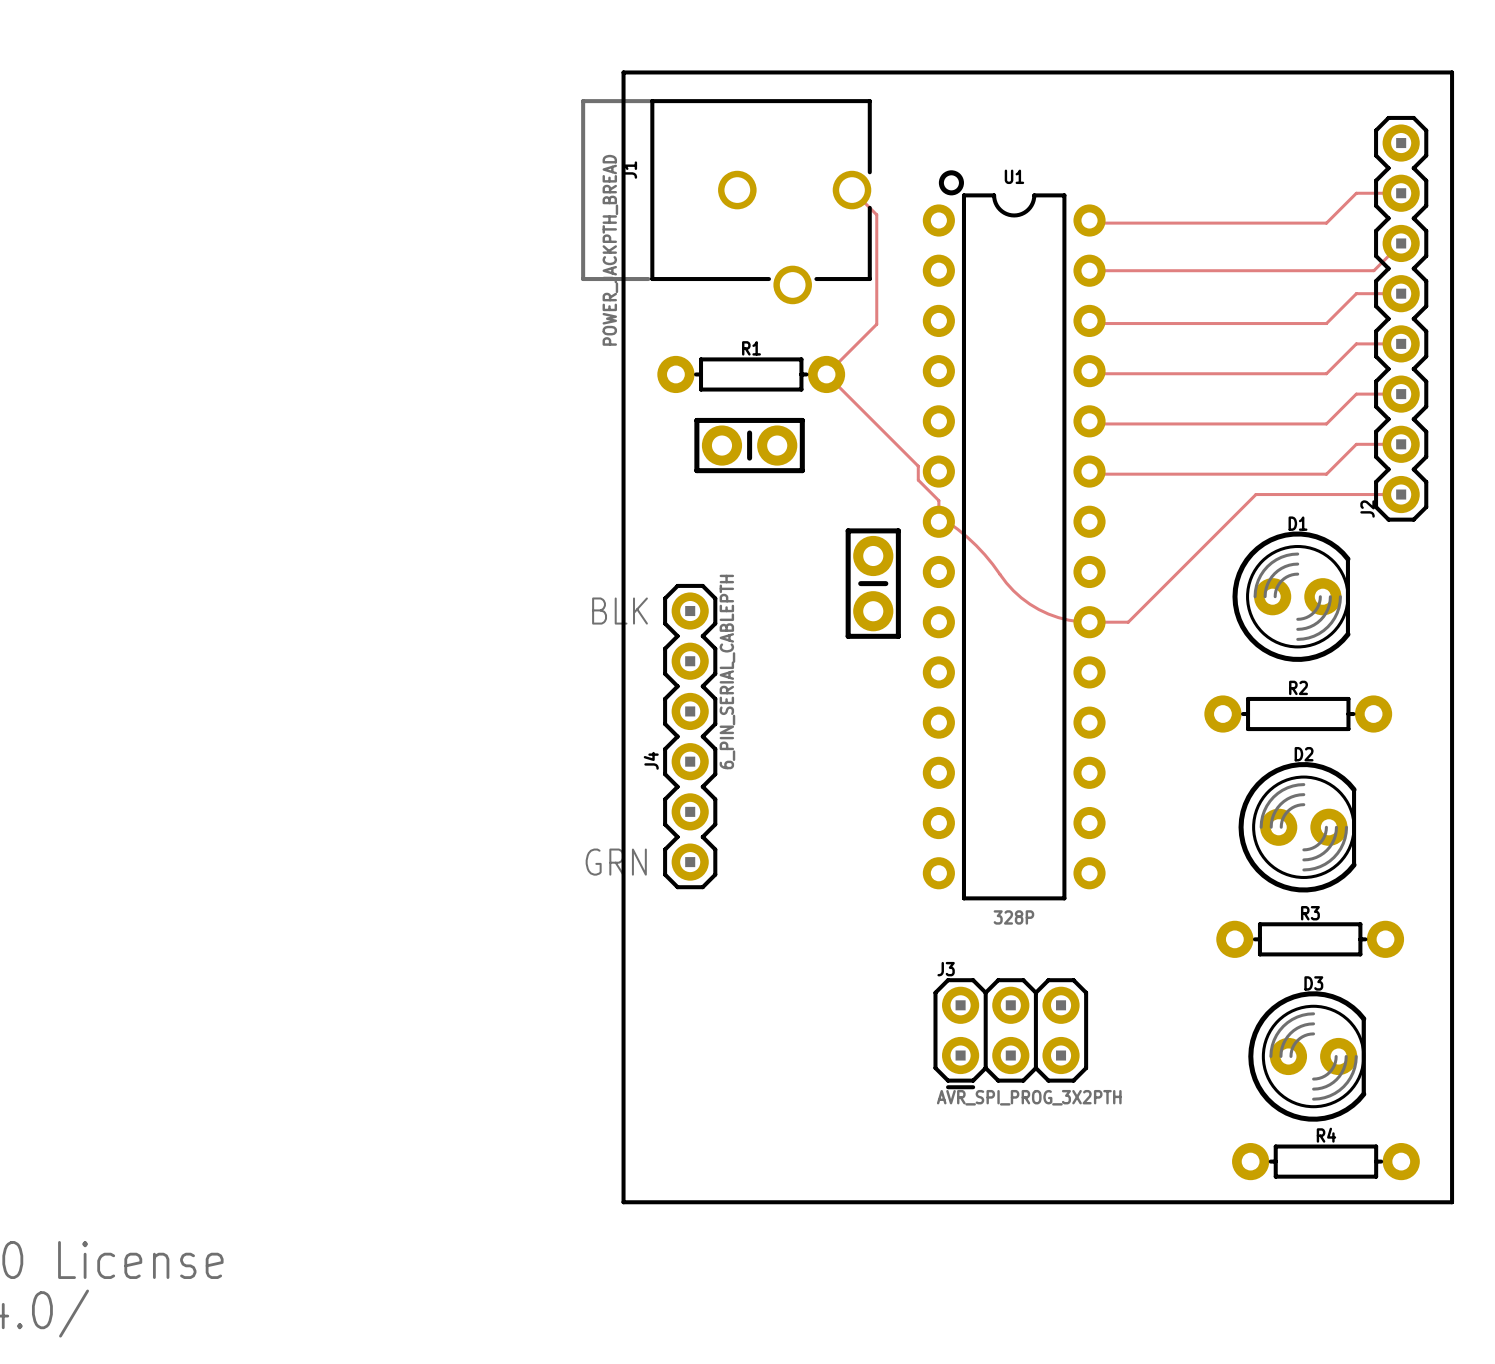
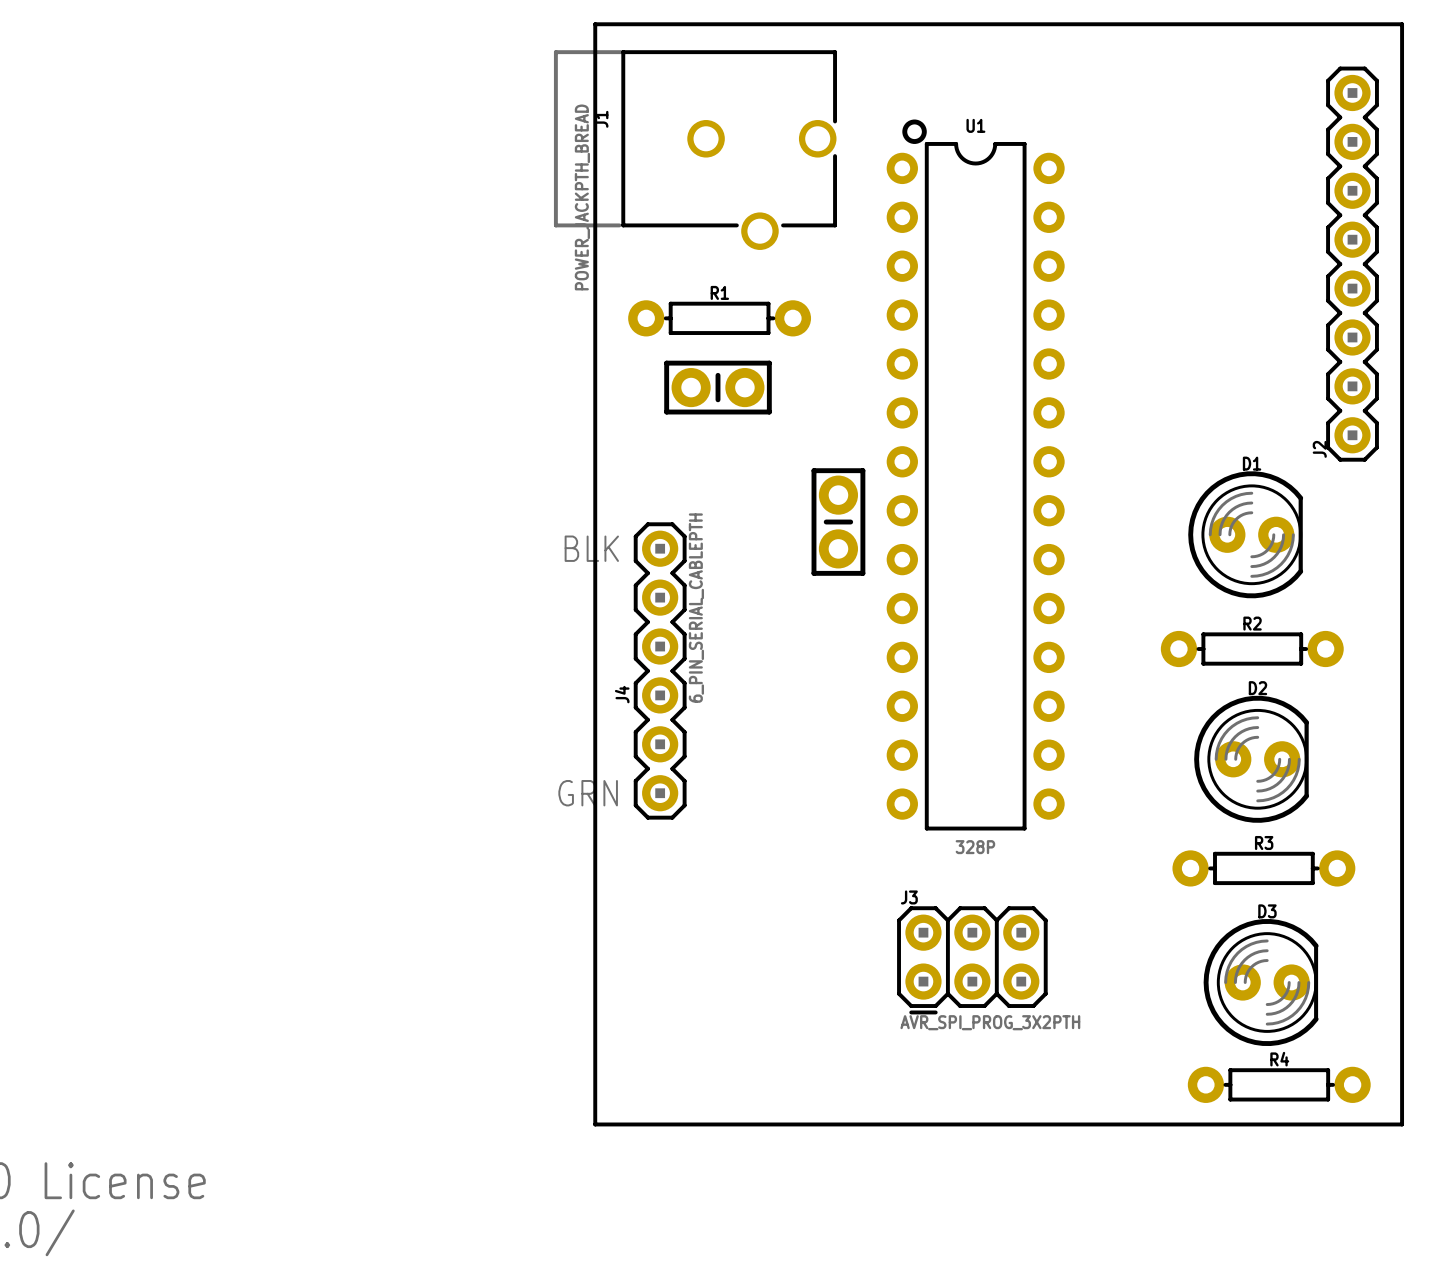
track: (851, 190) (876, 214) (876, 324) (826, 374) (918, 466) (918, 480) (938, 500) (938, 521) (947, 521) (967, 537) (984, 554) (1013, 590) (1038, 609) (1058, 617) (1078, 621) (1128, 622) (1255, 494) (1401, 494) -> none
track: (1401, 193) (1356, 193) (1326, 223) (1092, 223) (1089, 220) -> none
track: (1401, 243) (1373, 270) (1089, 270) -> none
track: (1401, 293) (1356, 293) (1326, 323) (1092, 323) (1089, 320) -> none
track: (1401, 343) (1356, 343) (1326, 373) (1092, 373) (1089, 371) -> none
track: (1401, 394) (1356, 394) (1326, 423) (1092, 423) (1089, 421) -> none
track: (1401, 444) (1356, 444) (1326, 474) (1092, 474) (1089, 471) -> none

